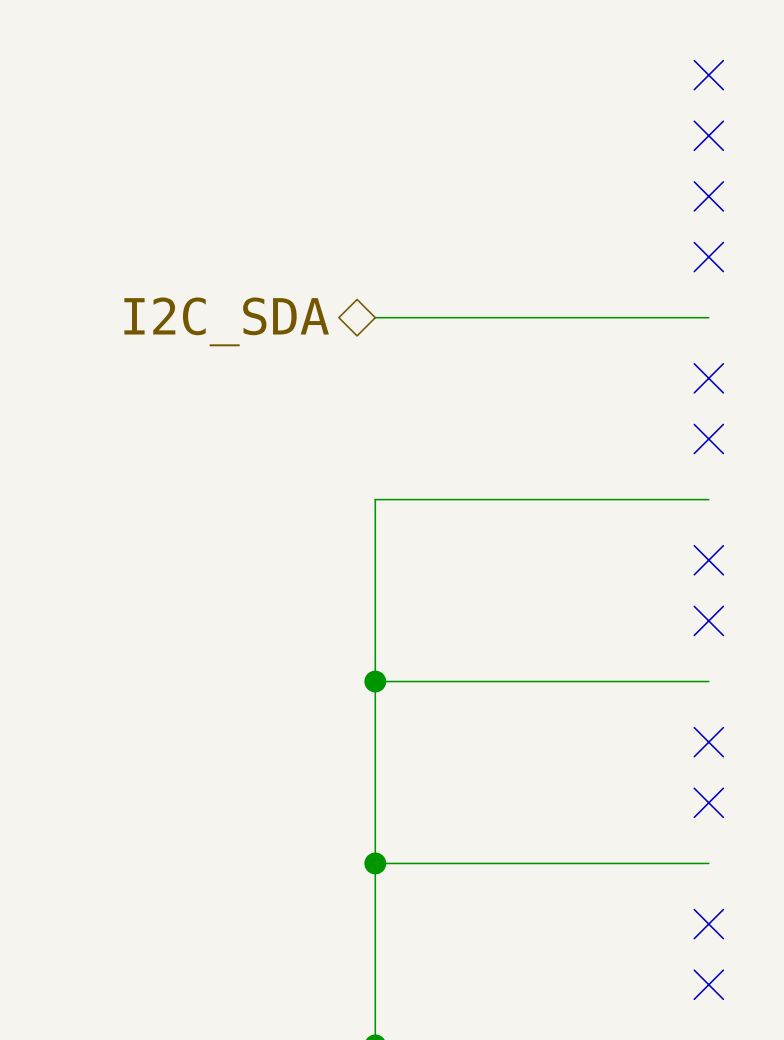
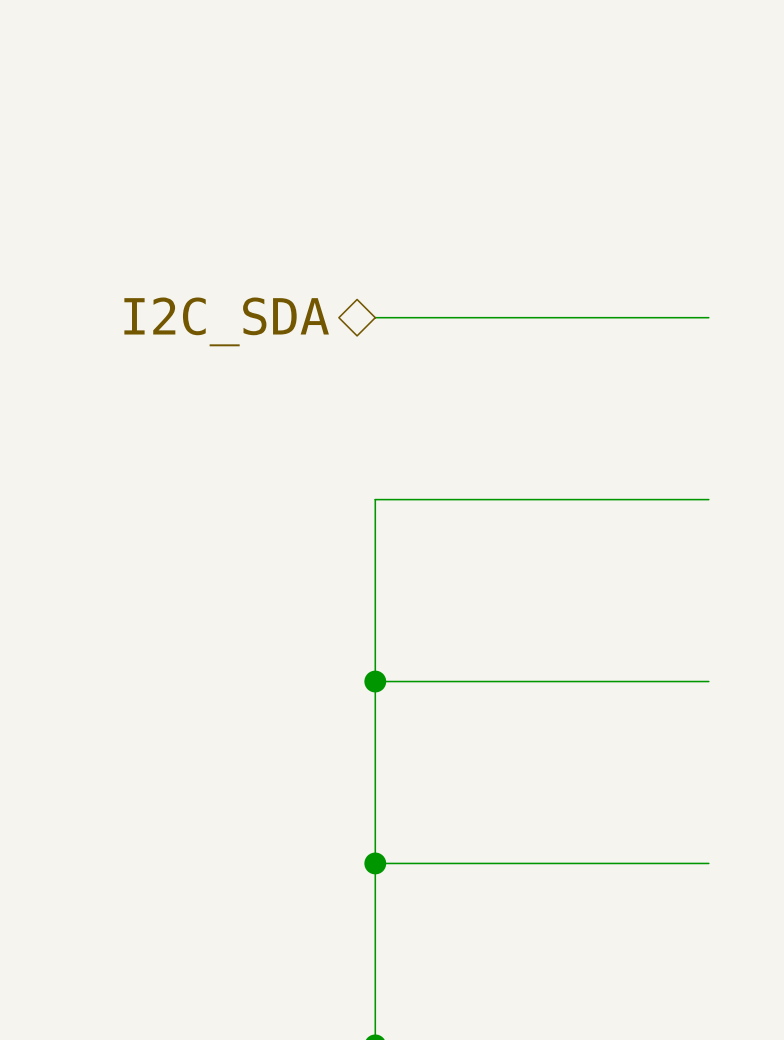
no-connect mark: (708, 75) -> none
no-connect mark: (708, 135) -> none
no-connect mark: (708, 196) -> none
no-connect mark: (708, 257) -> none
no-connect mark: (708, 378) -> none
no-connect mark: (708, 438) -> none
no-connect mark: (708, 560) -> none
no-connect mark: (708, 620) -> none
no-connect mark: (708, 742) -> none
no-connect mark: (708, 802) -> none
no-connect mark: (708, 924) -> none
no-connect mark: (708, 984) -> none

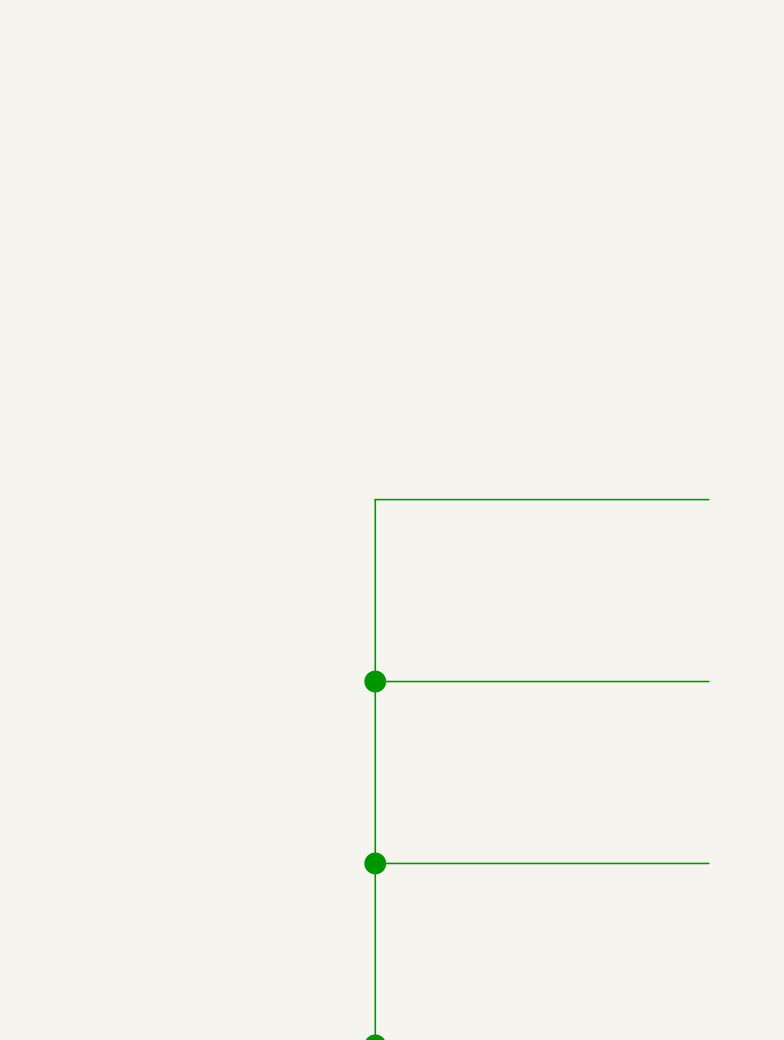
wire: (375, 317) (708, 317) -> none
hierarchical label: I2C_SDA (226, 321) -> none

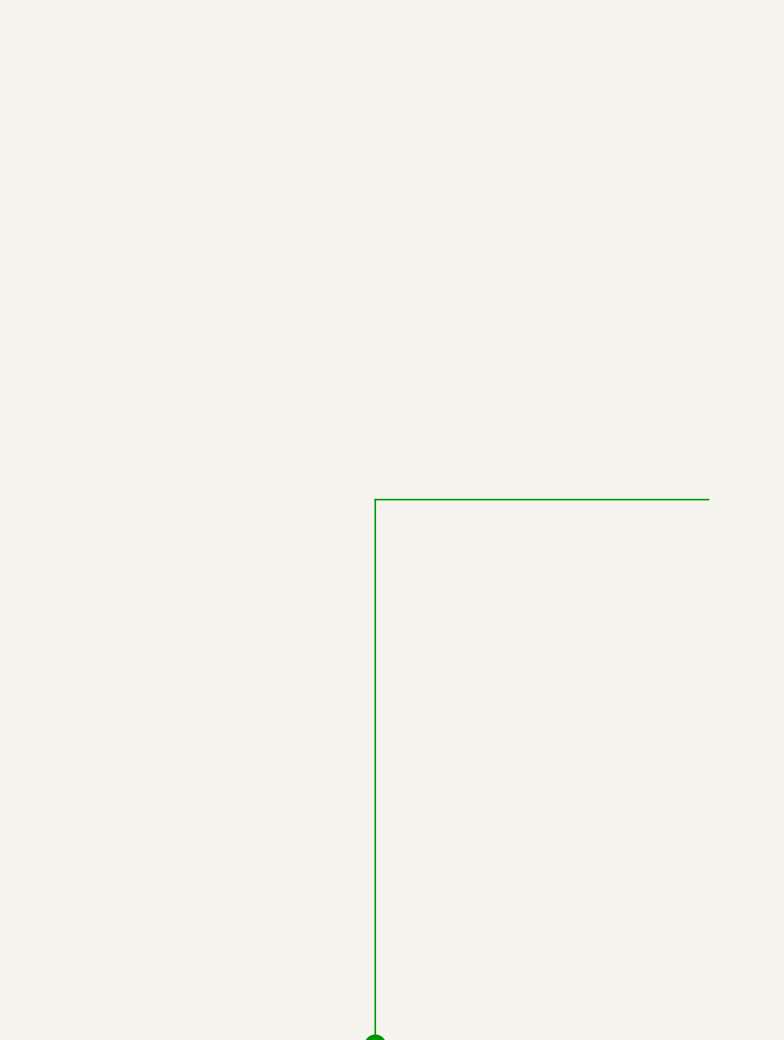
wire: (375, 681) (708, 681) -> none
junction: (375, 681) -> none
wire: (375, 863) (708, 863) -> none
junction: (375, 863) -> none

